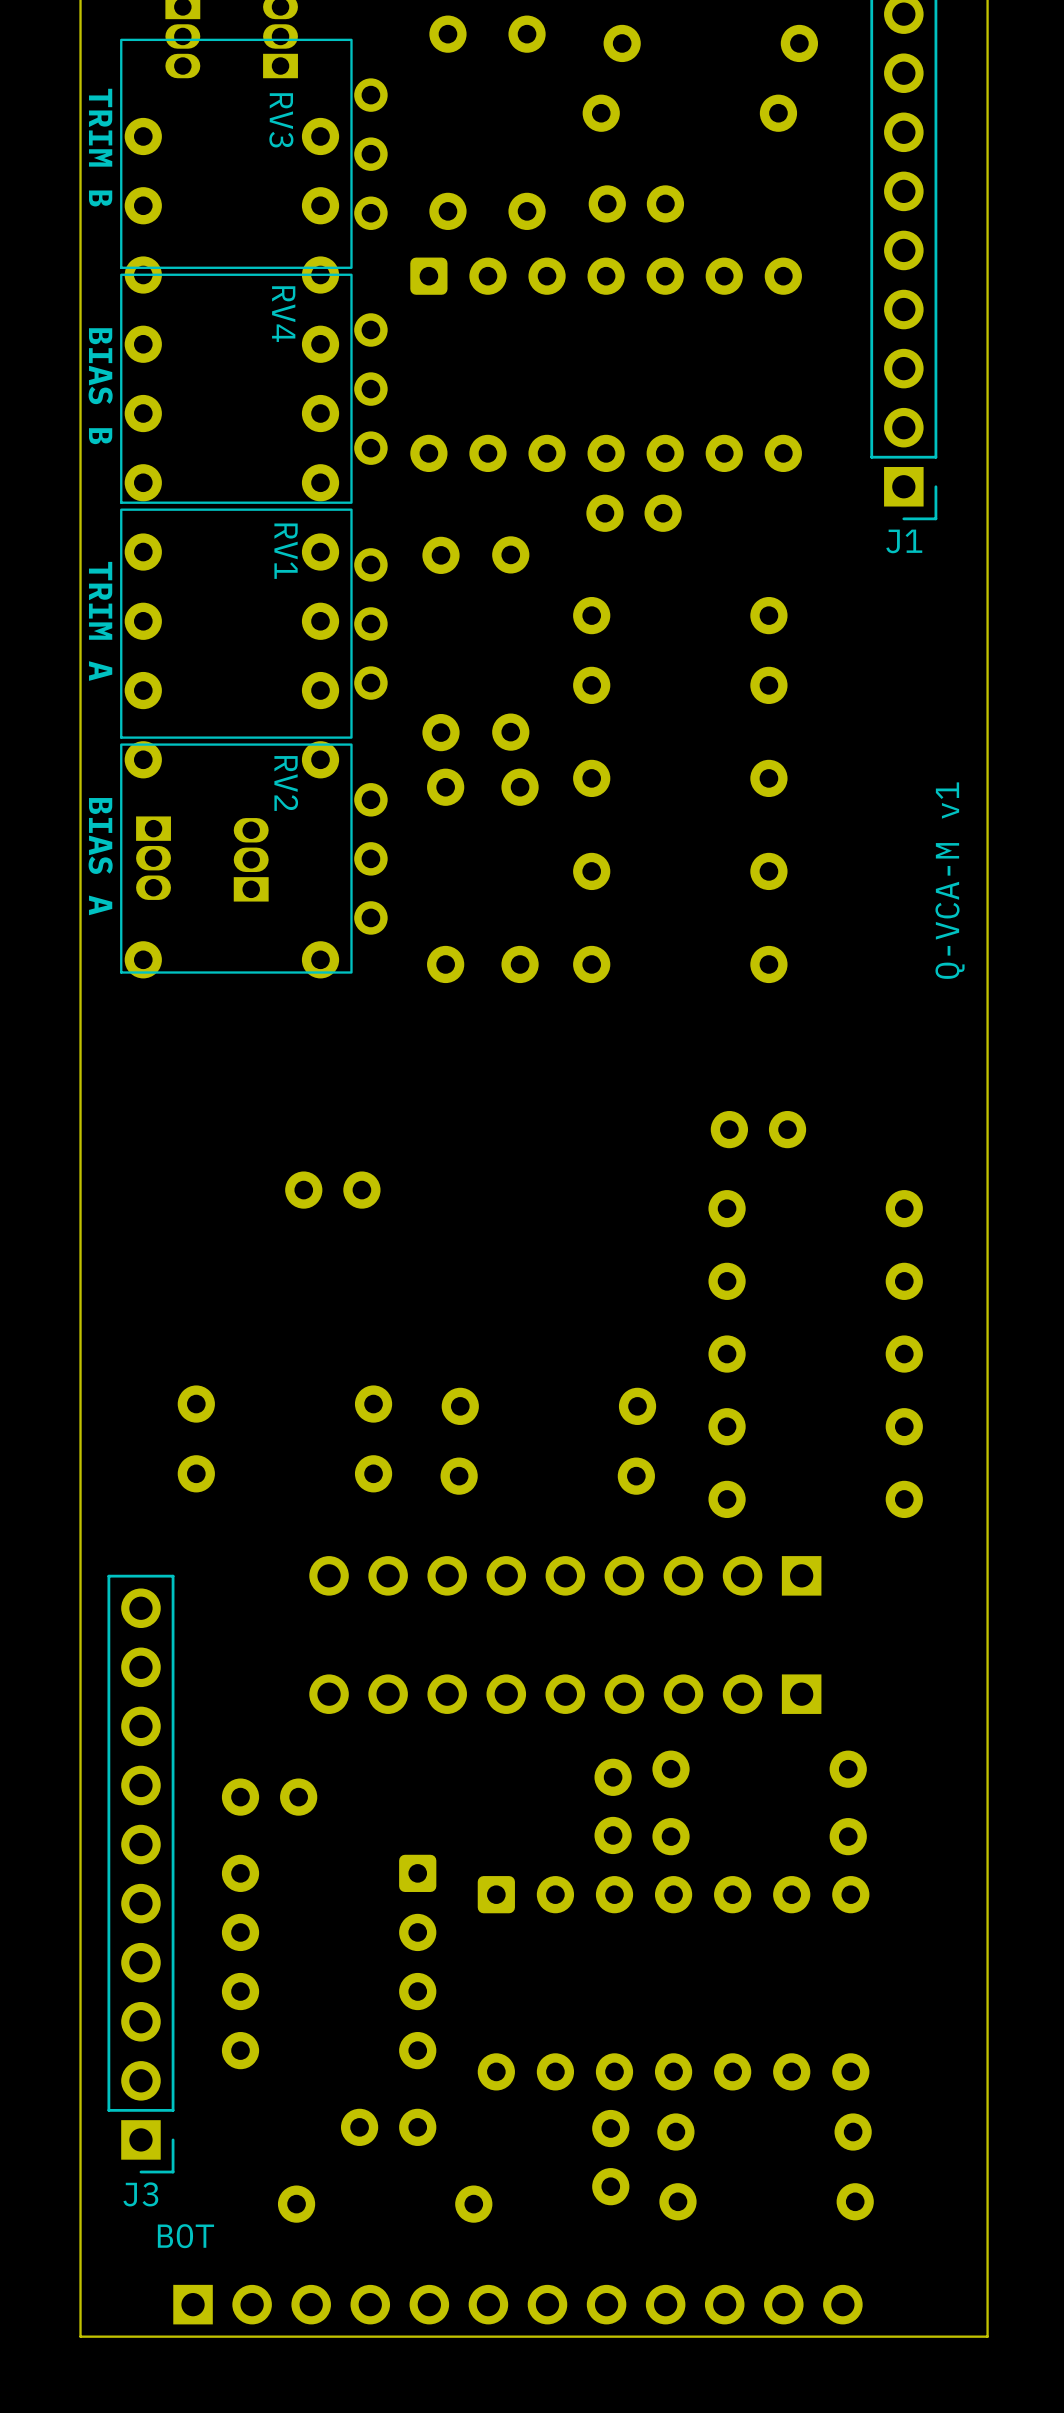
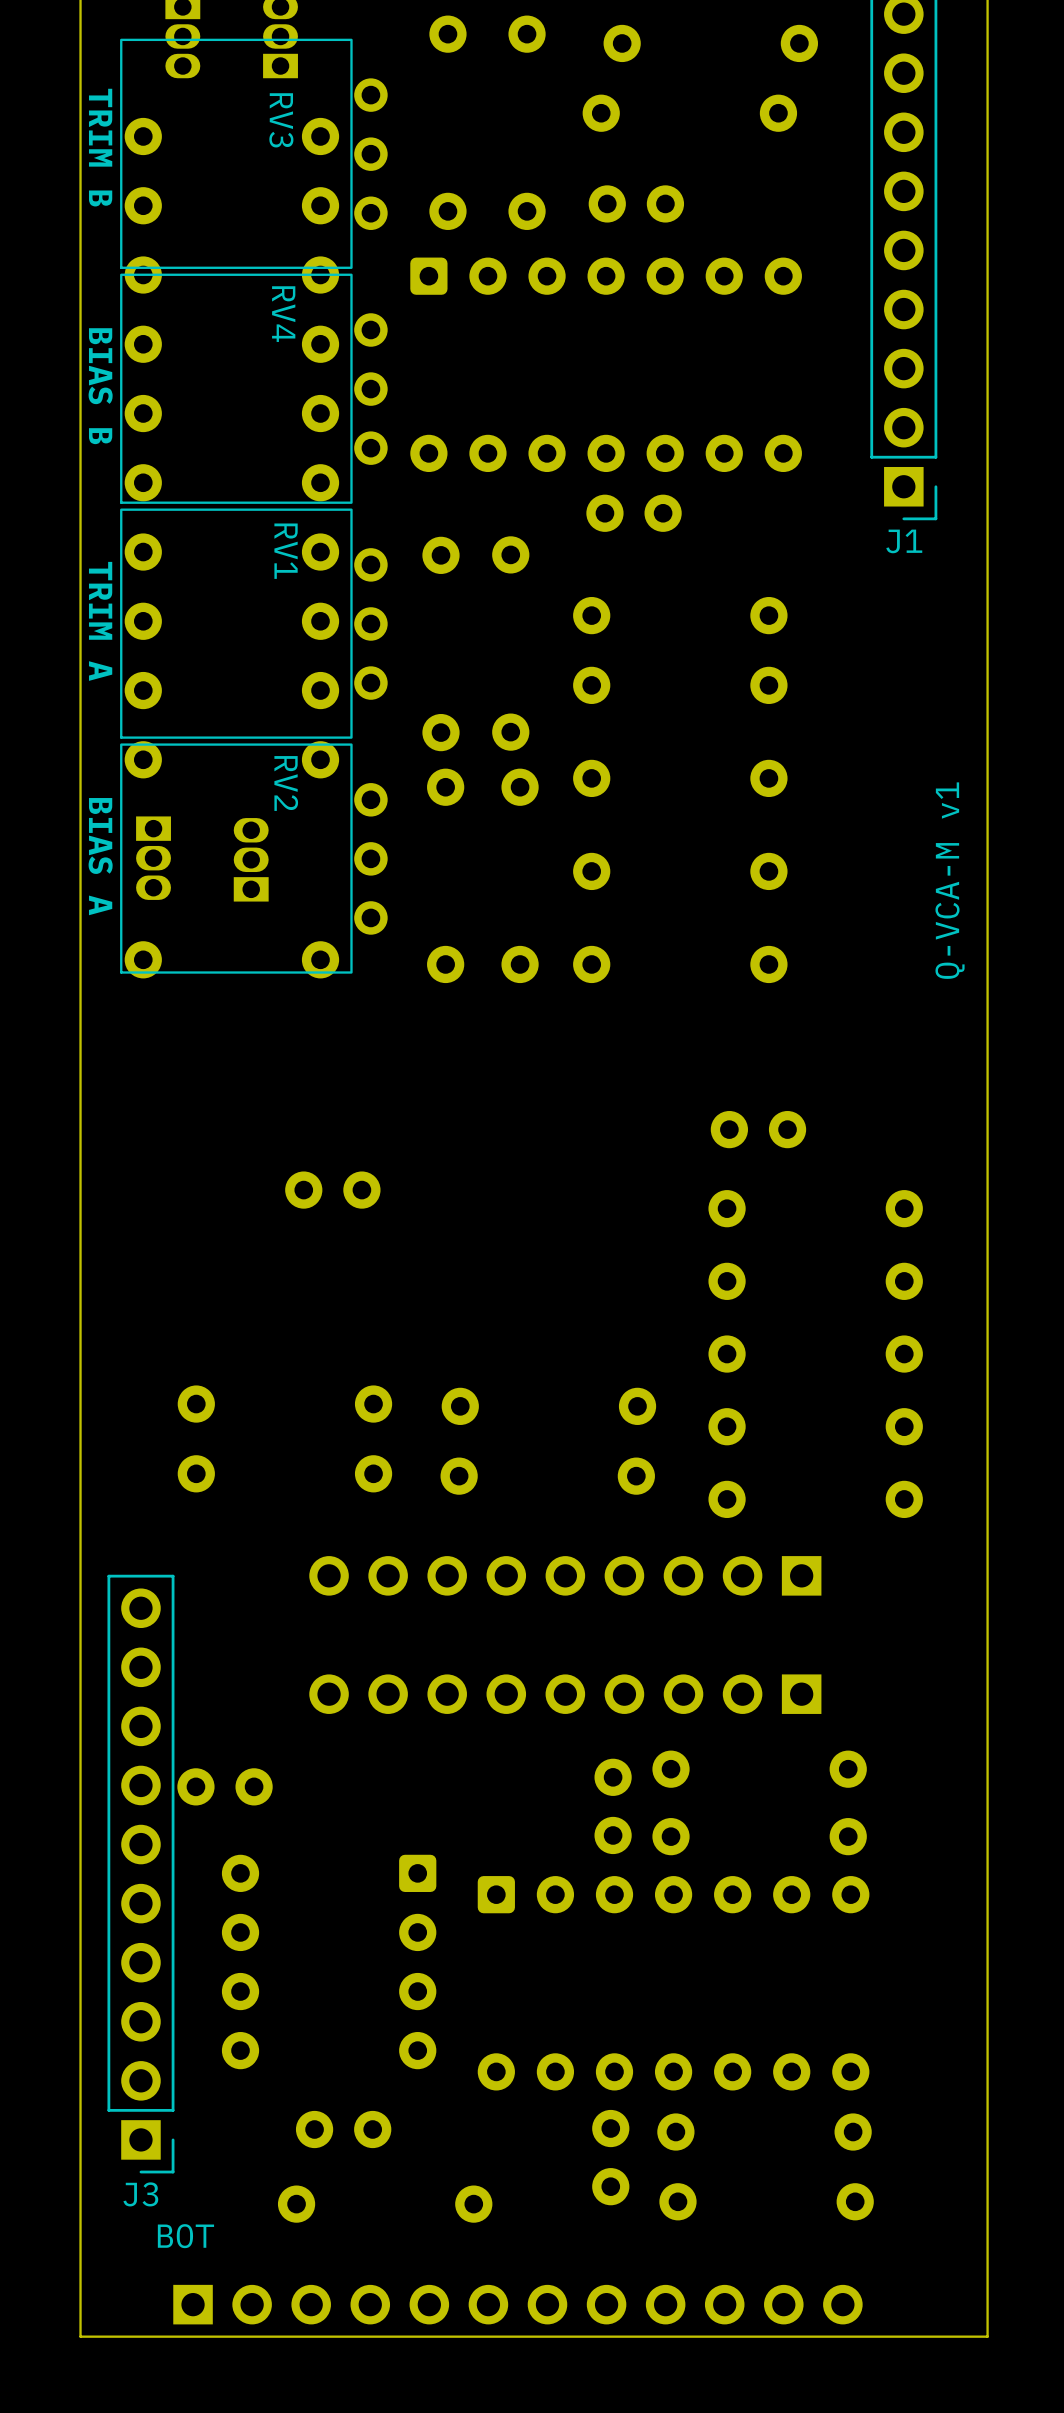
part position: (269, 1797) -> (225, 1786)
part position: (388, 2127) -> (343, 2129)

